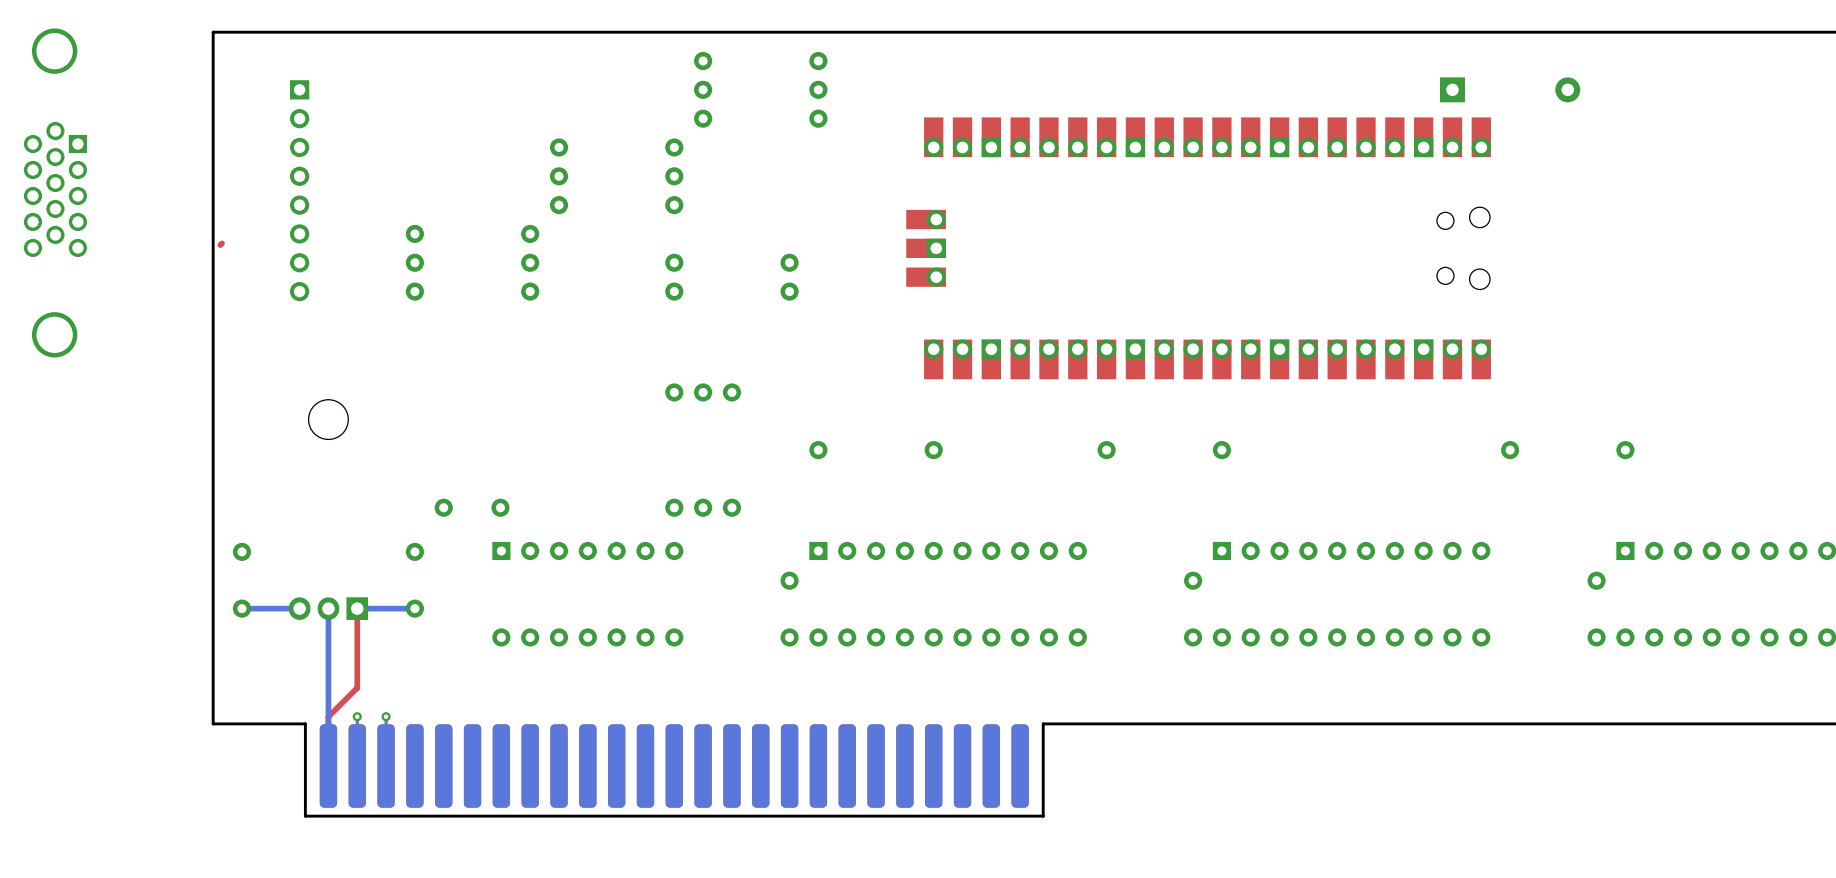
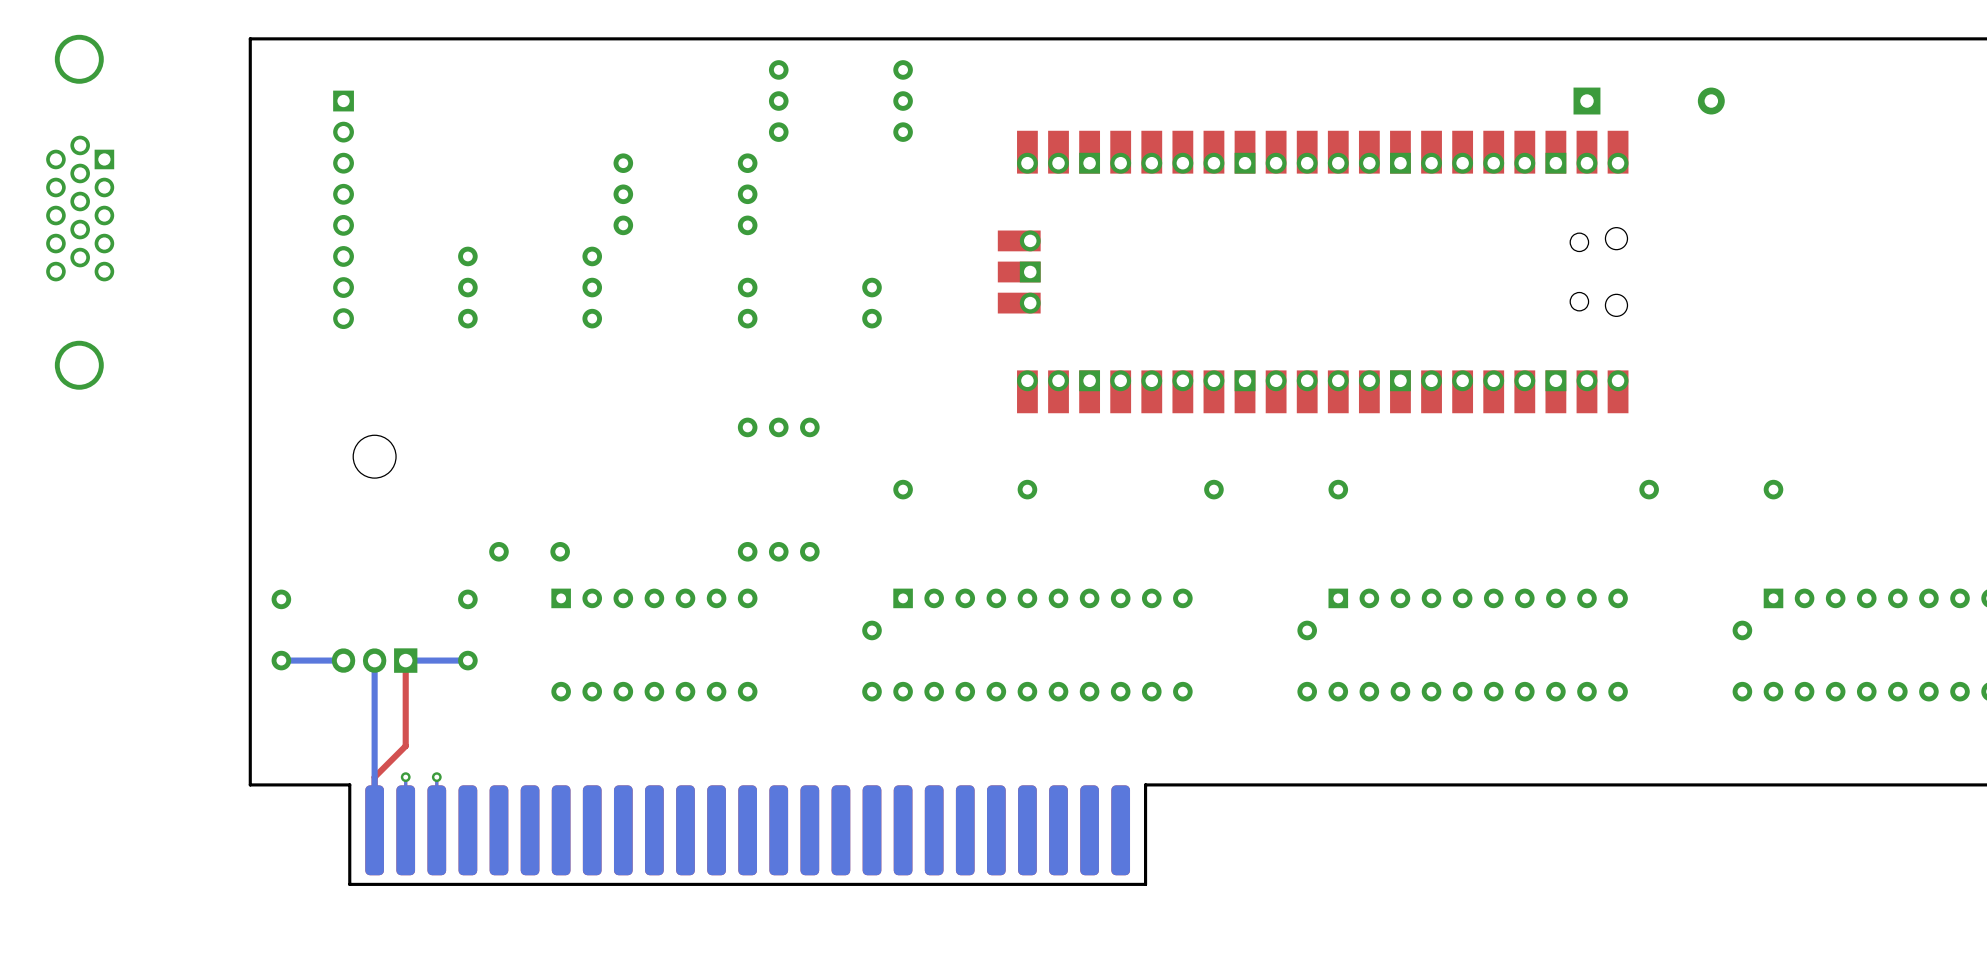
top track: (222, 243) (220, 245) -> none

